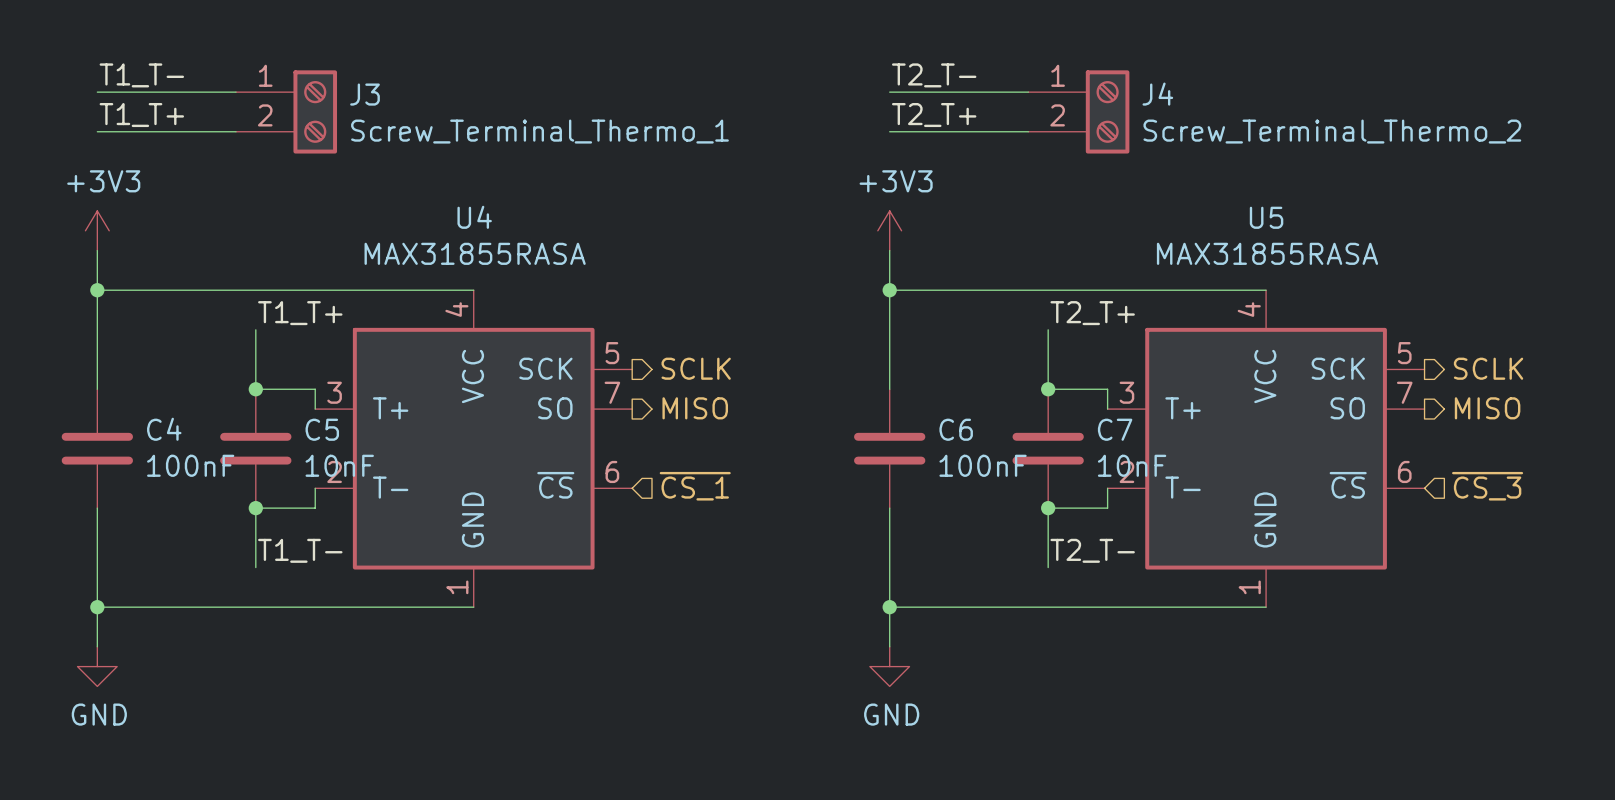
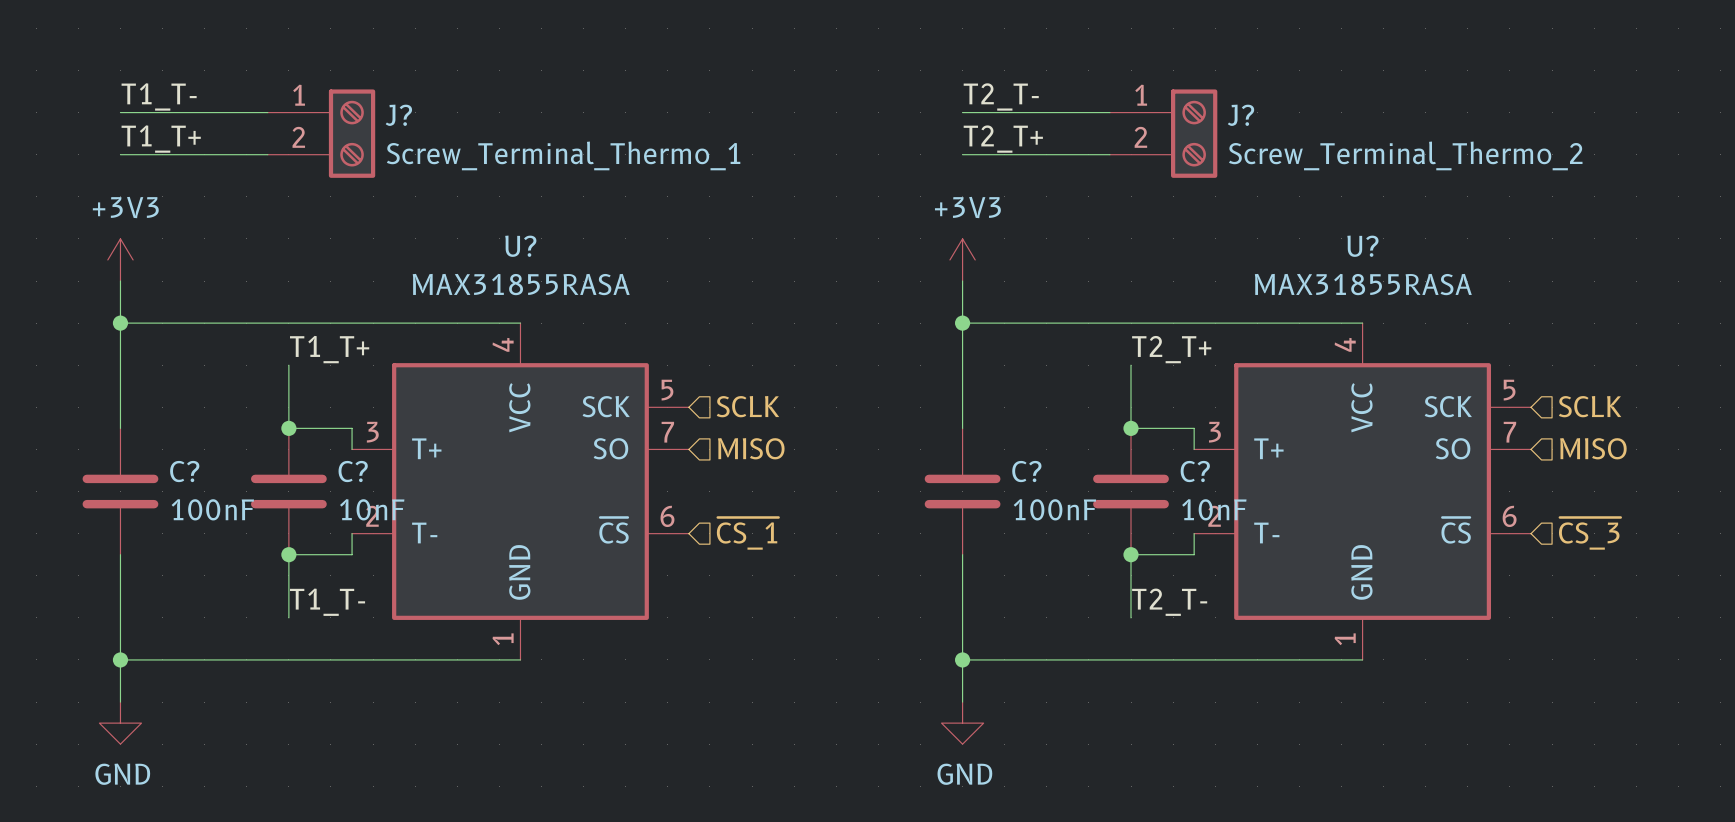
J3 name: J3 (365, 94) -> J? (398, 115)
J4 name: J4 (1157, 94) -> J? (1241, 115)
U4 name: U4 (474, 217) -> U? (520, 246)
U5 name: U5 (1266, 217) -> U? (1362, 246)
hierarchical label shape: output (696, 368) -> input (747, 406)
hierarchical label shape: output (1488, 368) -> input (1590, 406)
hierarchical label shape: output (695, 408) -> input (751, 448)
hierarchical label shape: output (1487, 408) -> input (1593, 448)
C4 name: C4 (164, 429) -> C? (184, 471)
C5 name: C5 (322, 429) -> C? (353, 471)
C6 name: C6 (956, 429) -> C? (1026, 471)
C7 name: C7 (1115, 429) -> C? (1195, 471)

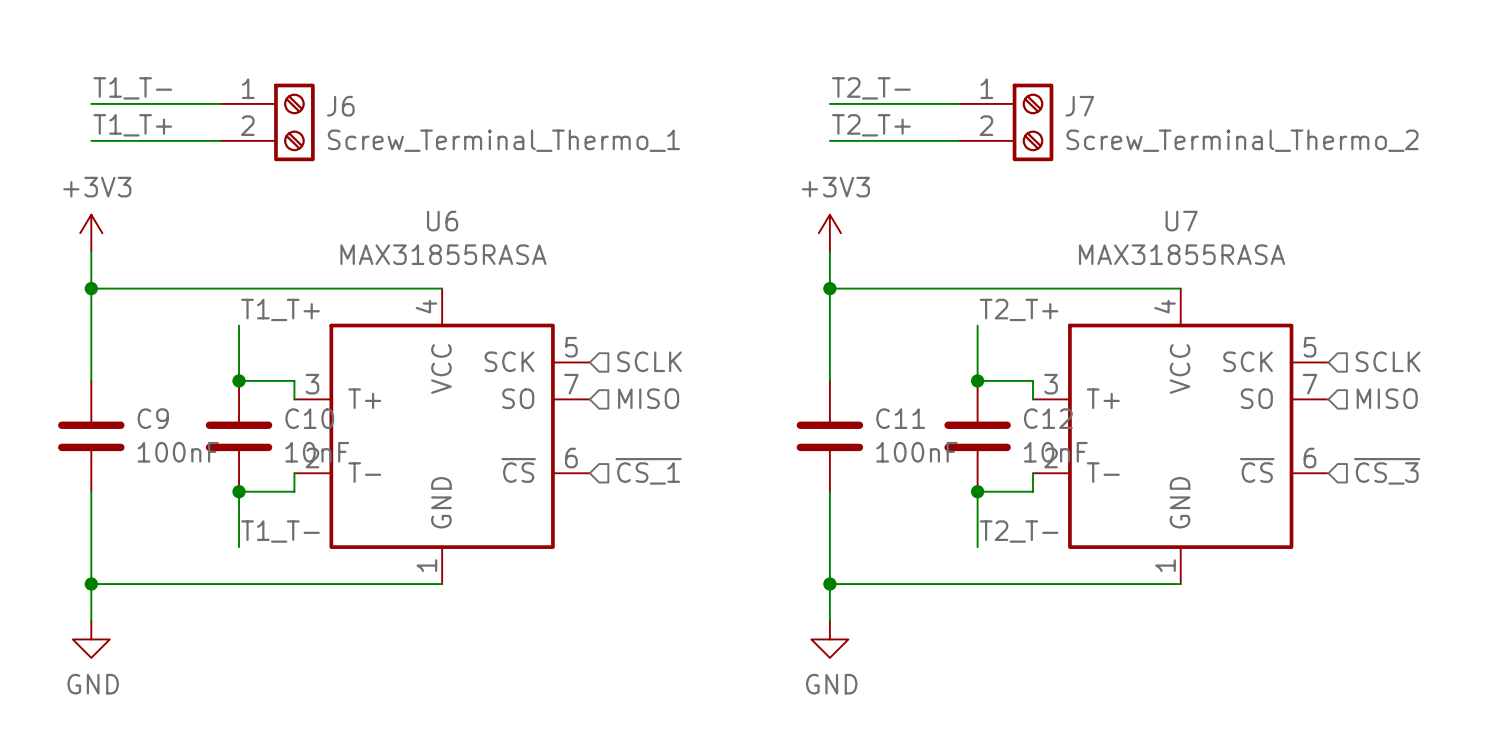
J? name: J? (398, 115) -> J6 (340, 106)
J? name: J? (1241, 115) -> J7 (1079, 106)
U? name: U? (520, 246) -> U6 (442, 221)
U? name: U? (1362, 246) -> U7 (1181, 221)
C? name: C? (184, 471) -> C9 (153, 418)
C? name: C? (353, 471) -> C10 (309, 418)
C? name: C? (1026, 471) -> C11 (900, 418)
C? name: C? (1195, 471) -> C12 (1048, 418)

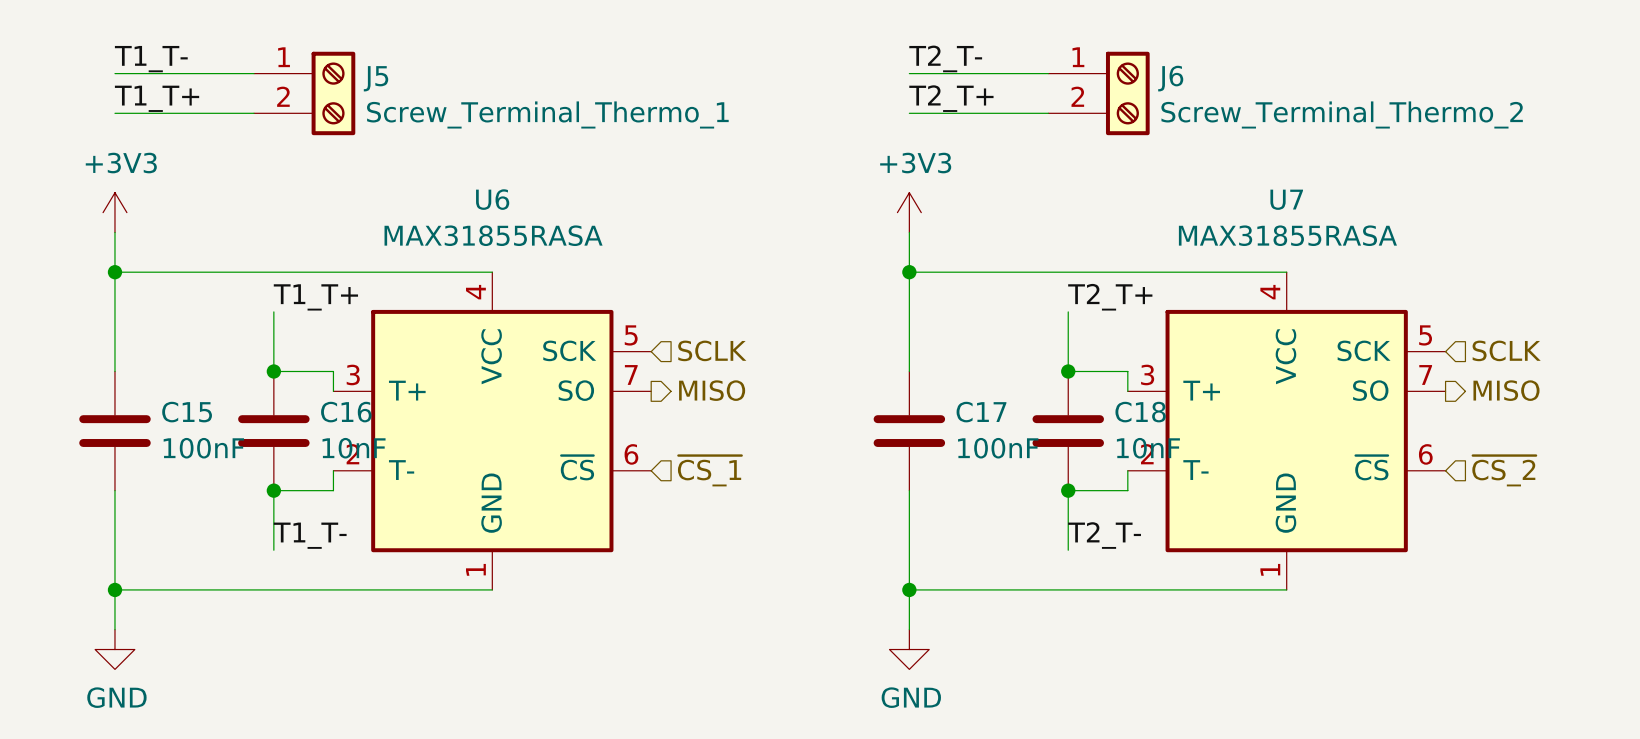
J6 name: J6 (340, 106) -> J5 (376, 78)
J7 name: J7 (1079, 106) -> J6 (1170, 78)
hierarchical label shape: input (648, 398) -> output (712, 390)
hierarchical label shape: input (1387, 398) -> output (1506, 390)
C9 name: C9 (153, 418) -> C15 (187, 412)
C10 name: C10 (309, 418) -> C16 (346, 412)
C11 name: C11 (900, 418) -> C17 (981, 412)
C12 name: C12 (1048, 418) -> C18 (1140, 412)
hierarchical label: ~{CS_3} (1387, 471) -> ~{CS_2} (1504, 470)

